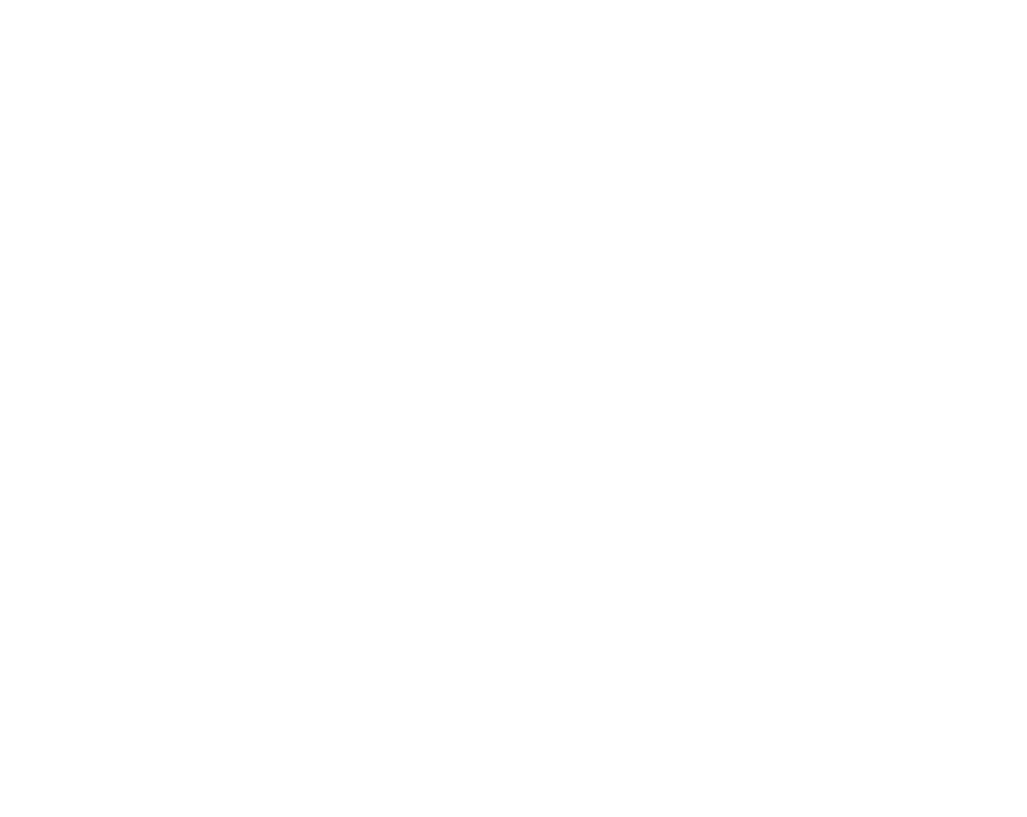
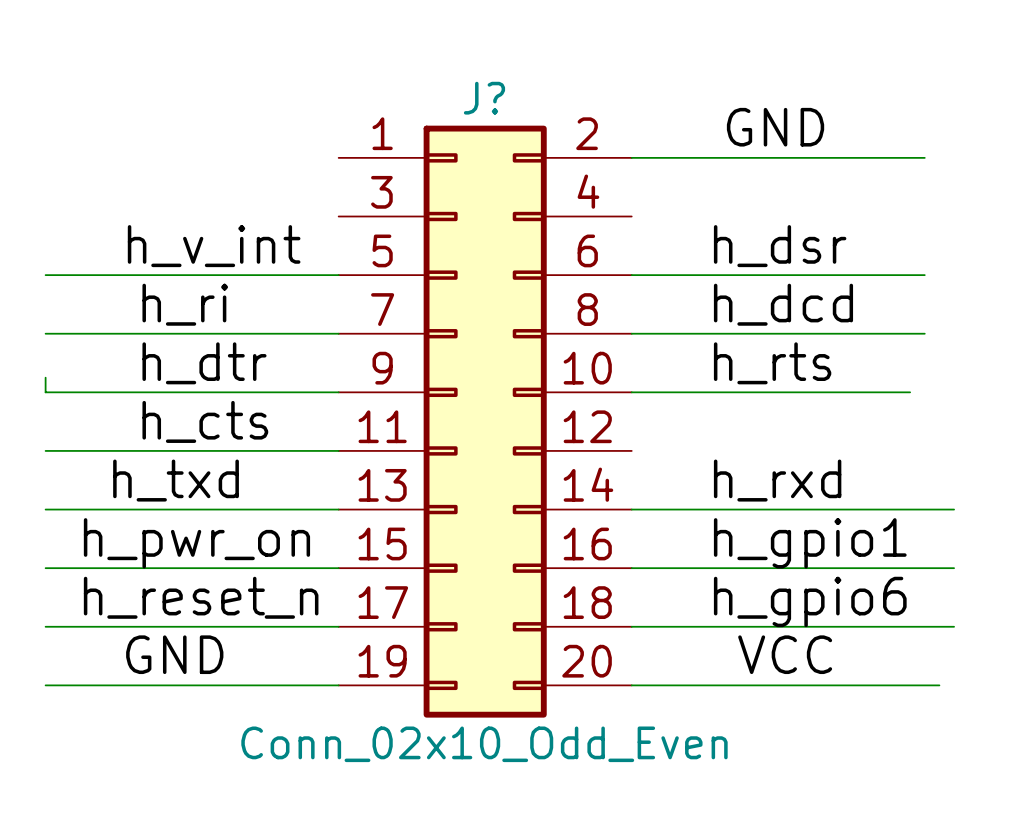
label: none -> GND (775, 127)
wire: none -> (631, 157) (924, 157)
label: none -> h_v_int (214, 246)
label: none -> h_dsr (780, 246)
wire: none -> (45, 275) (338, 275)
wire: none -> (631, 275) (924, 275)
label: none -> h_ri (185, 304)
label: none -> h_dcd (783, 304)
wire: none -> (45, 333) (338, 333)
wire: none -> (631, 333) (924, 333)
label: none -> h_dtr (204, 363)
label: none -> h_rts (772, 363)
wire: none -> (45, 377) (45, 392) (338, 392)
wire: none -> (631, 392) (910, 392)
label: none -> h_cts (205, 421)
J?: none -> Conn_02x10_Odd_Even (485, 421)
wire: none -> (45, 450) (338, 450)
label: none -> h_txd (176, 480)
label: none -> h_rxd (777, 480)
wire: none -> (45, 509) (338, 509)
wire: none -> (631, 509) (954, 509)
label: none -> h_pwr_on (196, 543)
label: none -> h_gpio1 (810, 543)
wire: none -> (45, 568) (338, 568)
wire: none -> (631, 568) (954, 568)
label: none -> h_reset_n (201, 597)
label: none -> h_gpio6 (810, 601)
wire: none -> (45, 626) (338, 626)
wire: none -> (631, 626) (954, 626)
label: none -> GND (174, 654)
label: none -> VCC (785, 654)
wire: none -> (45, 685) (338, 685)
wire: none -> (631, 685) (939, 685)

